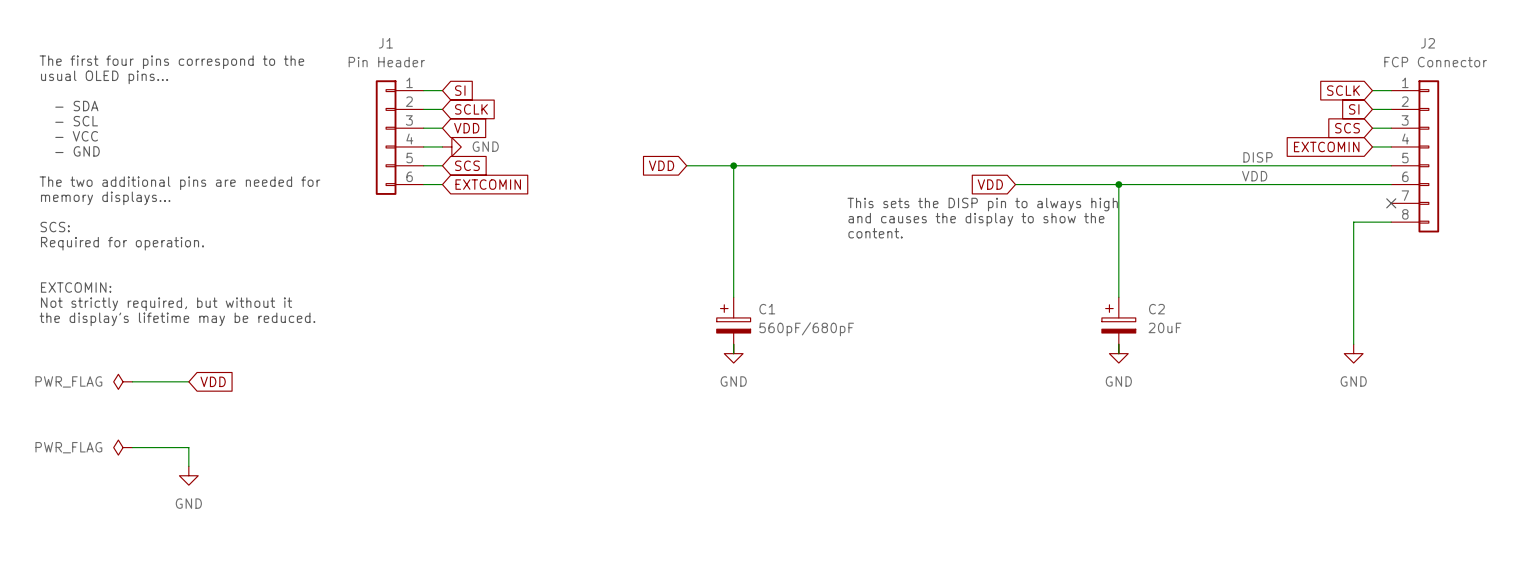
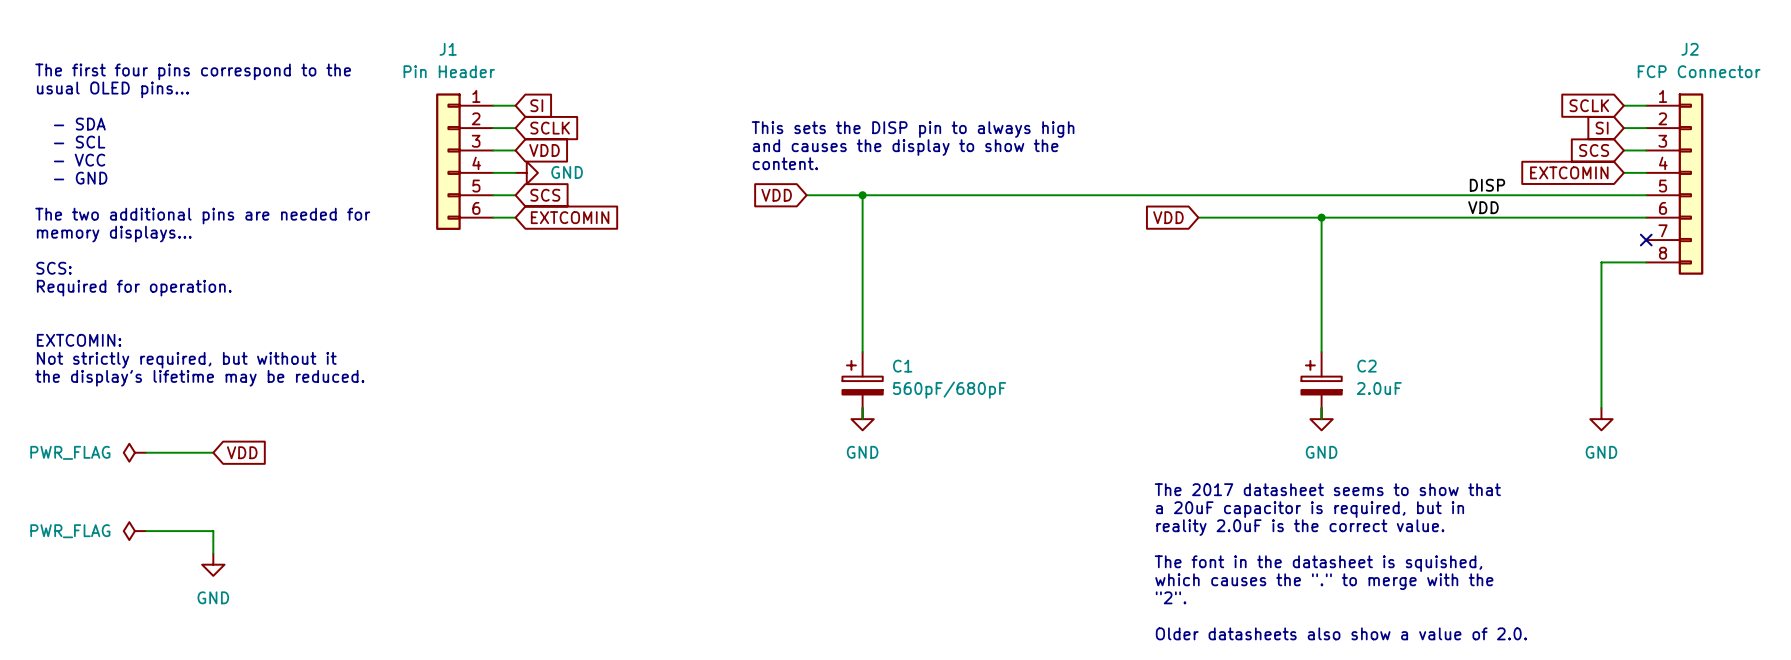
text: none -> This sets the DISP pin to always high (913, 129)
text: none -> and causes the display to show the (905, 147)
text: none -> content. (785, 163)
text: This sets the DISP pin to always high (982, 204) -> none
text: and causes the display to show the (976, 219) -> none
text: content. (875, 233) -> none
C2 value: 20uF (1164, 327) -> 2.0uF (1379, 388)
text: none -> The 2017 datasheet seems to show that (1327, 489)
text: none -> a 20uF capacitor is required, but in (1309, 509)
text: none -> reality 2.0uF is the correct value. (1300, 527)
text: none -> The font in the datasheet is squished, (1318, 563)
text: none -> which causes the "." to merge with the (1324, 581)
text: none -> "2". (1171, 597)
text: none -> Older datasheets also show a value of 2.0. (1341, 633)

